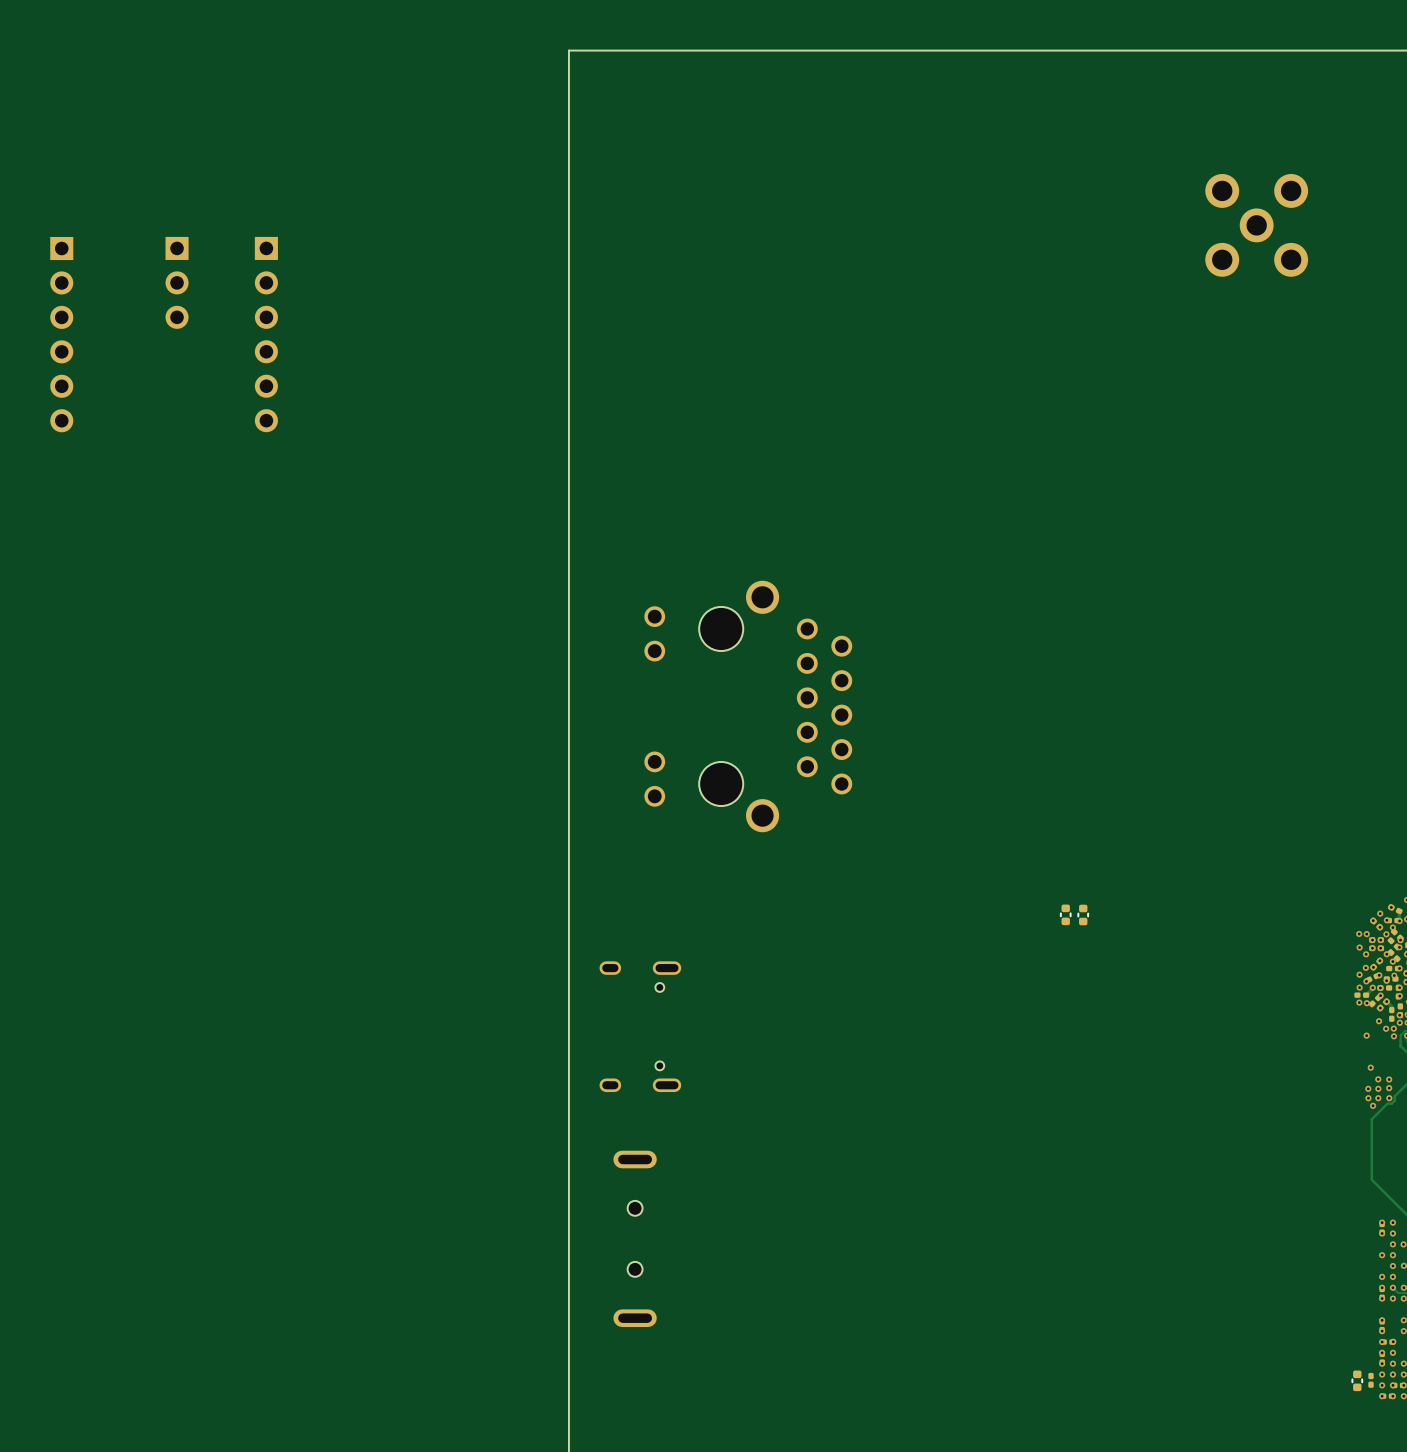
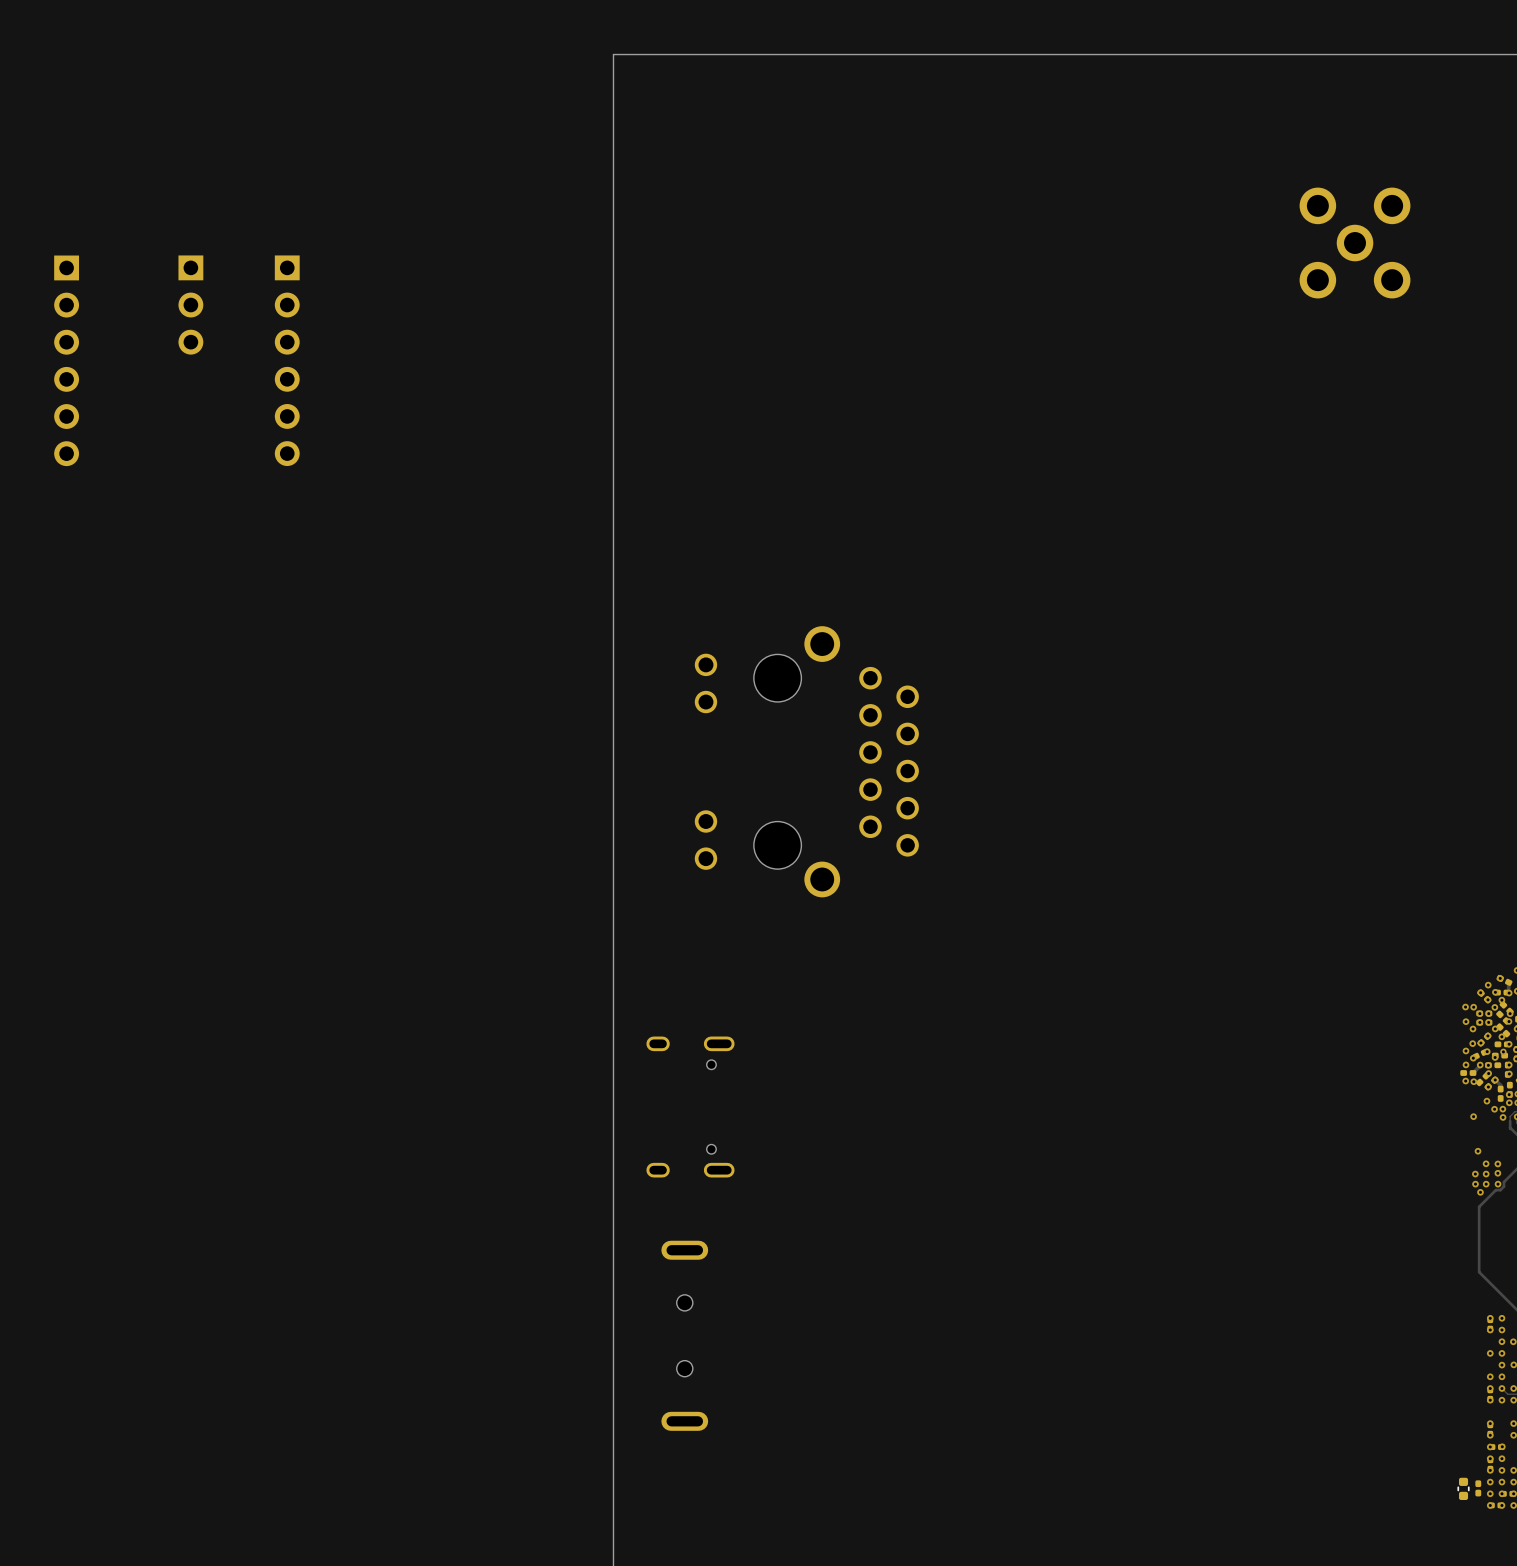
part: (1065, 914) -> none
part: (1083, 914) -> none

